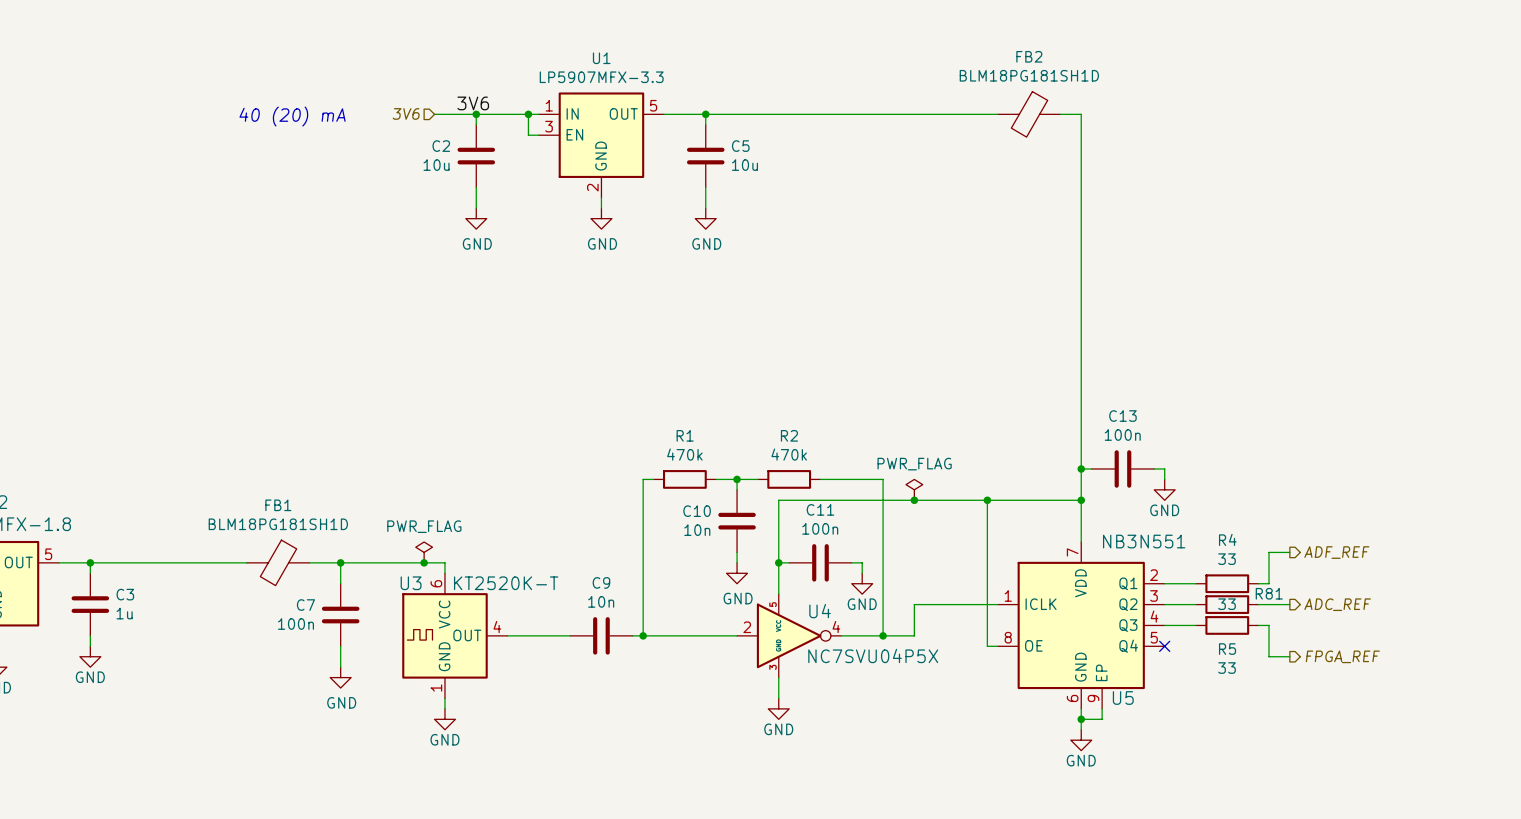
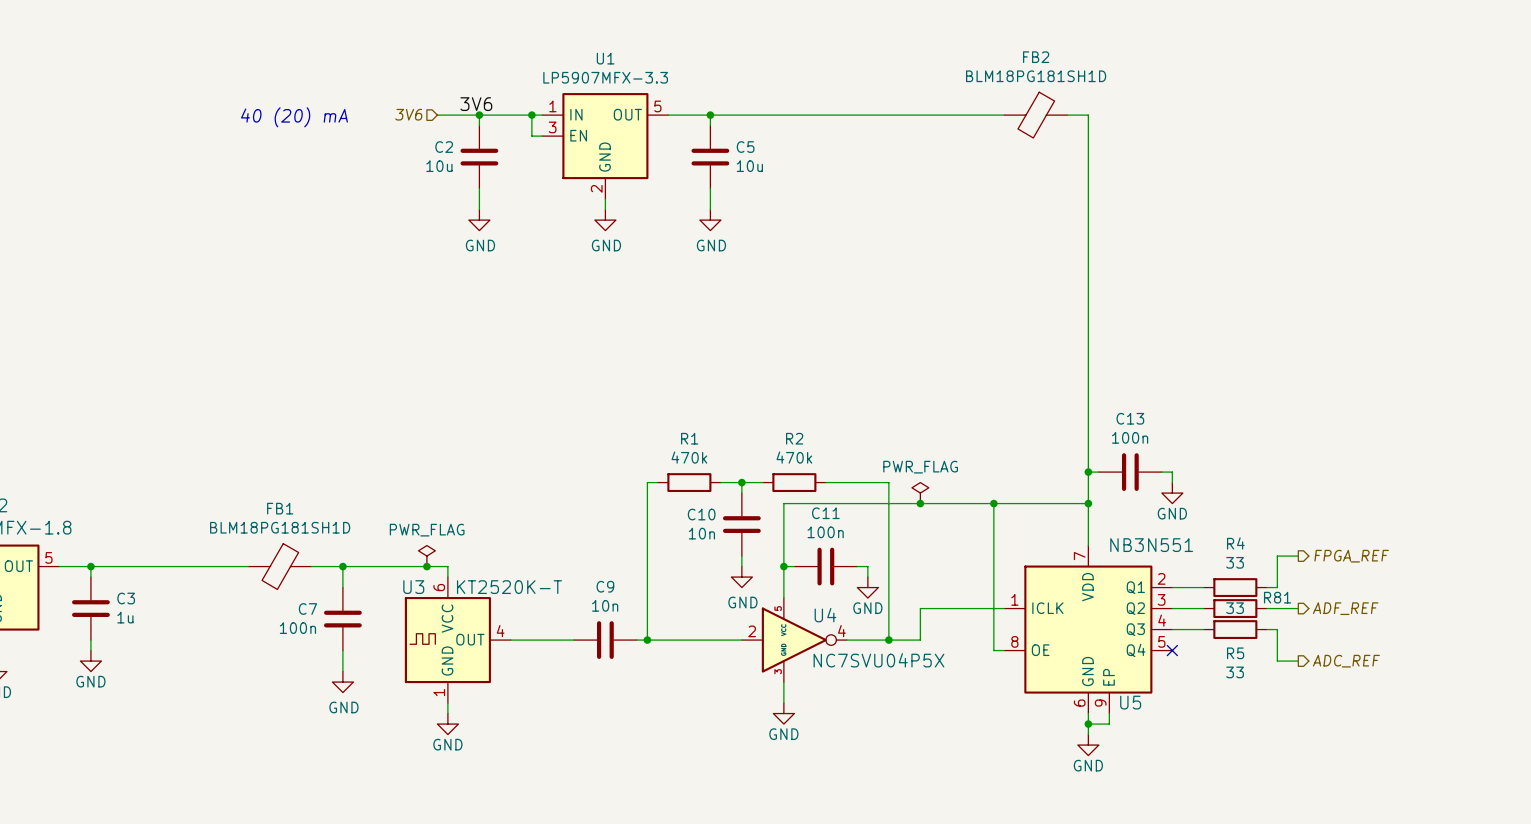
hierarchical label: ADF_REF (1336, 552) -> FPGA_REF (1351, 556)
hierarchical label: ADC_REF (1337, 604) -> ADF_REF (1345, 608)
hierarchical label: FPGA_REF (1342, 656) -> ADC_REF (1346, 661)

